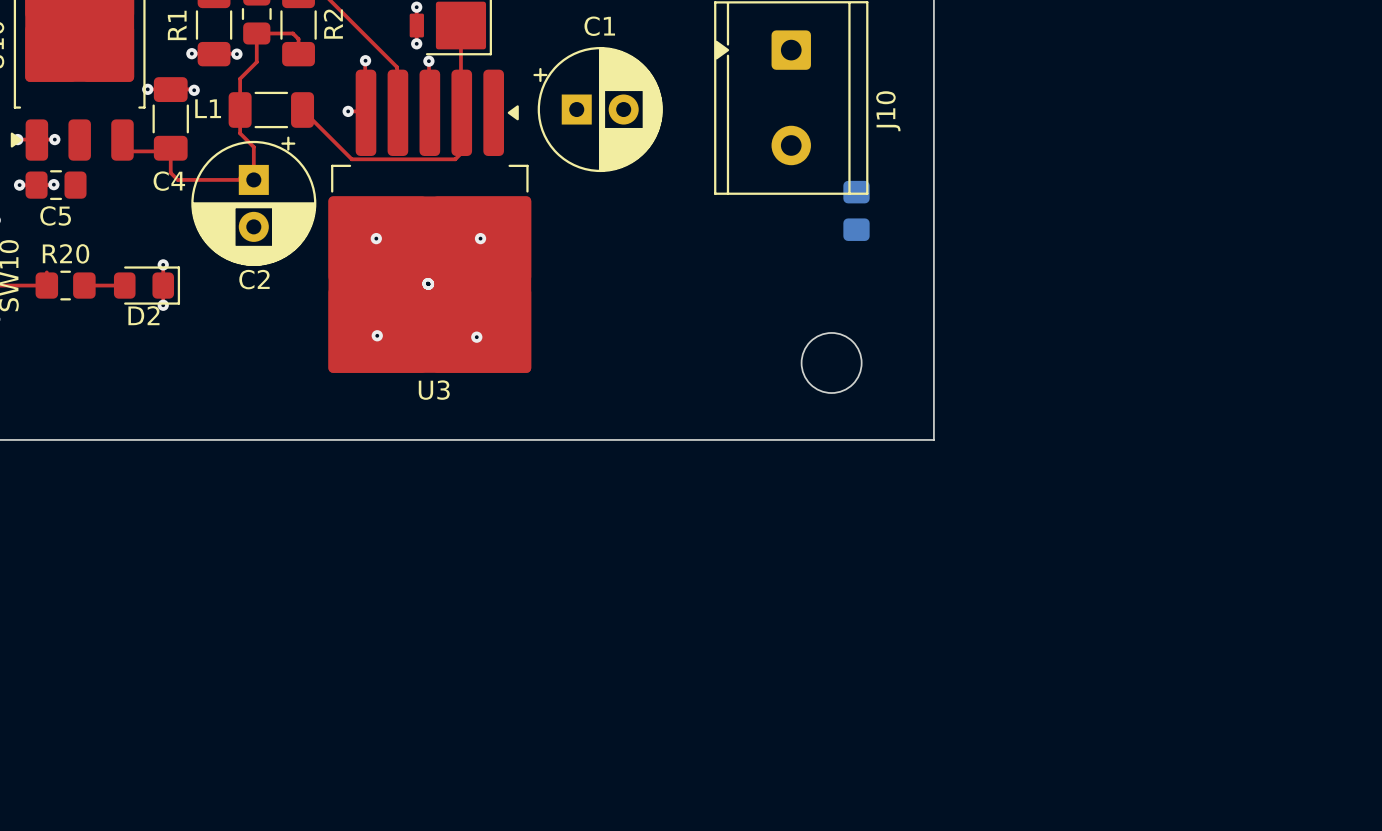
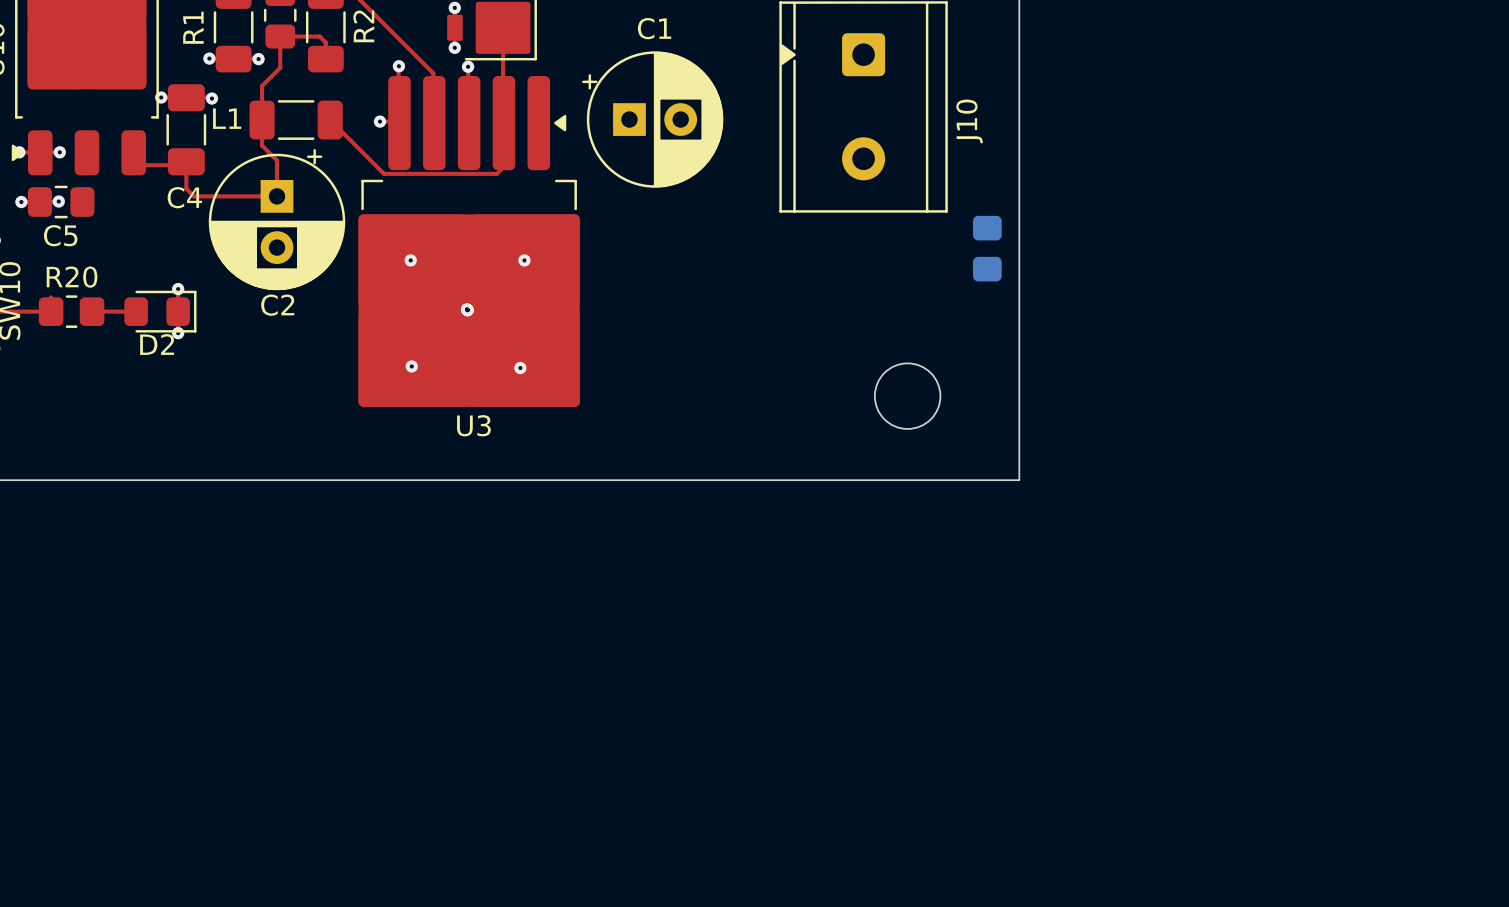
part position: (856, 210) -> (987, 248)

